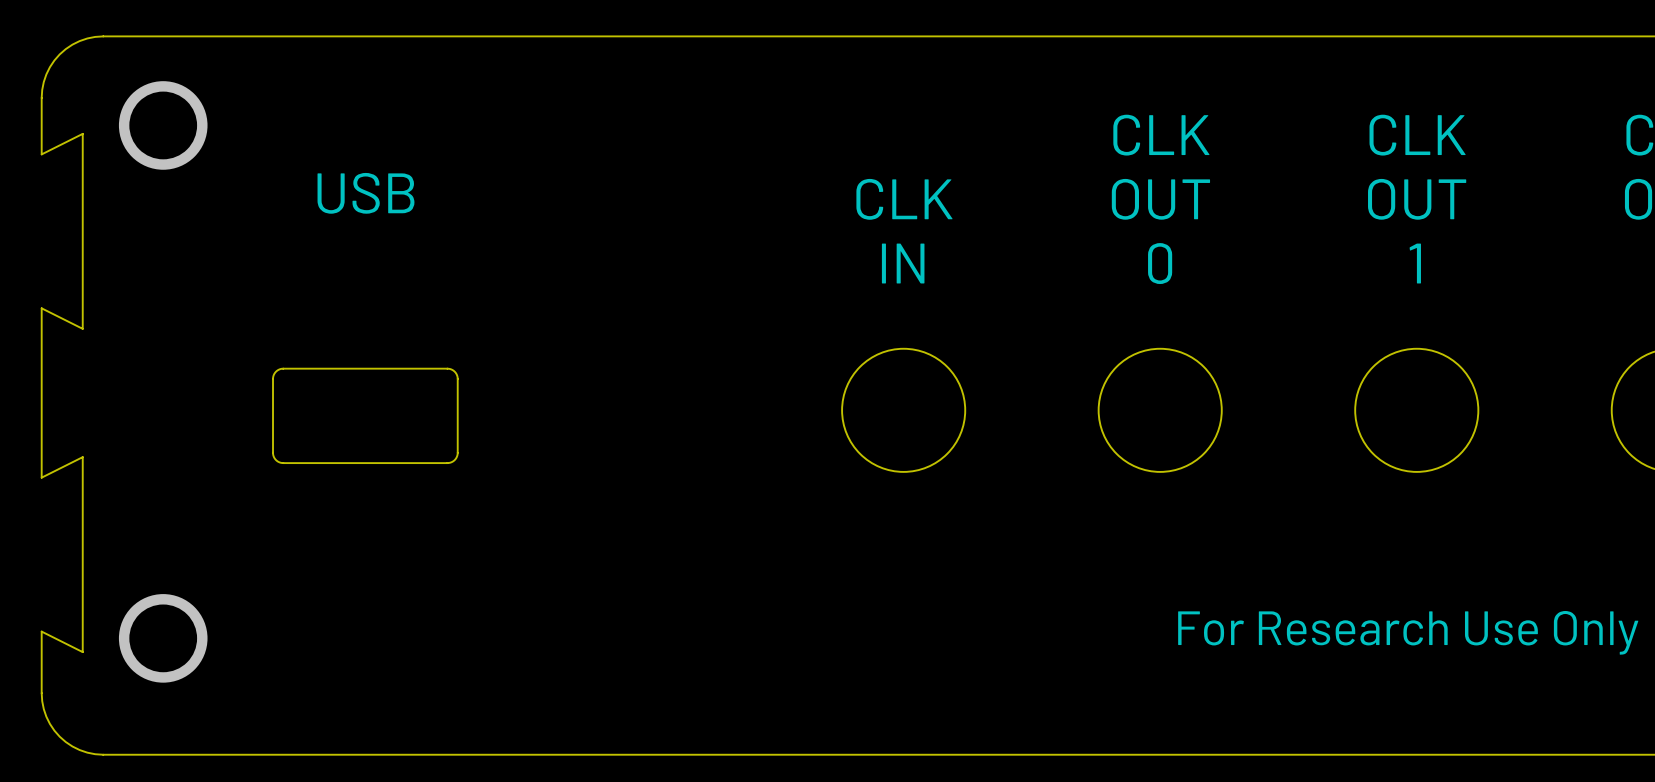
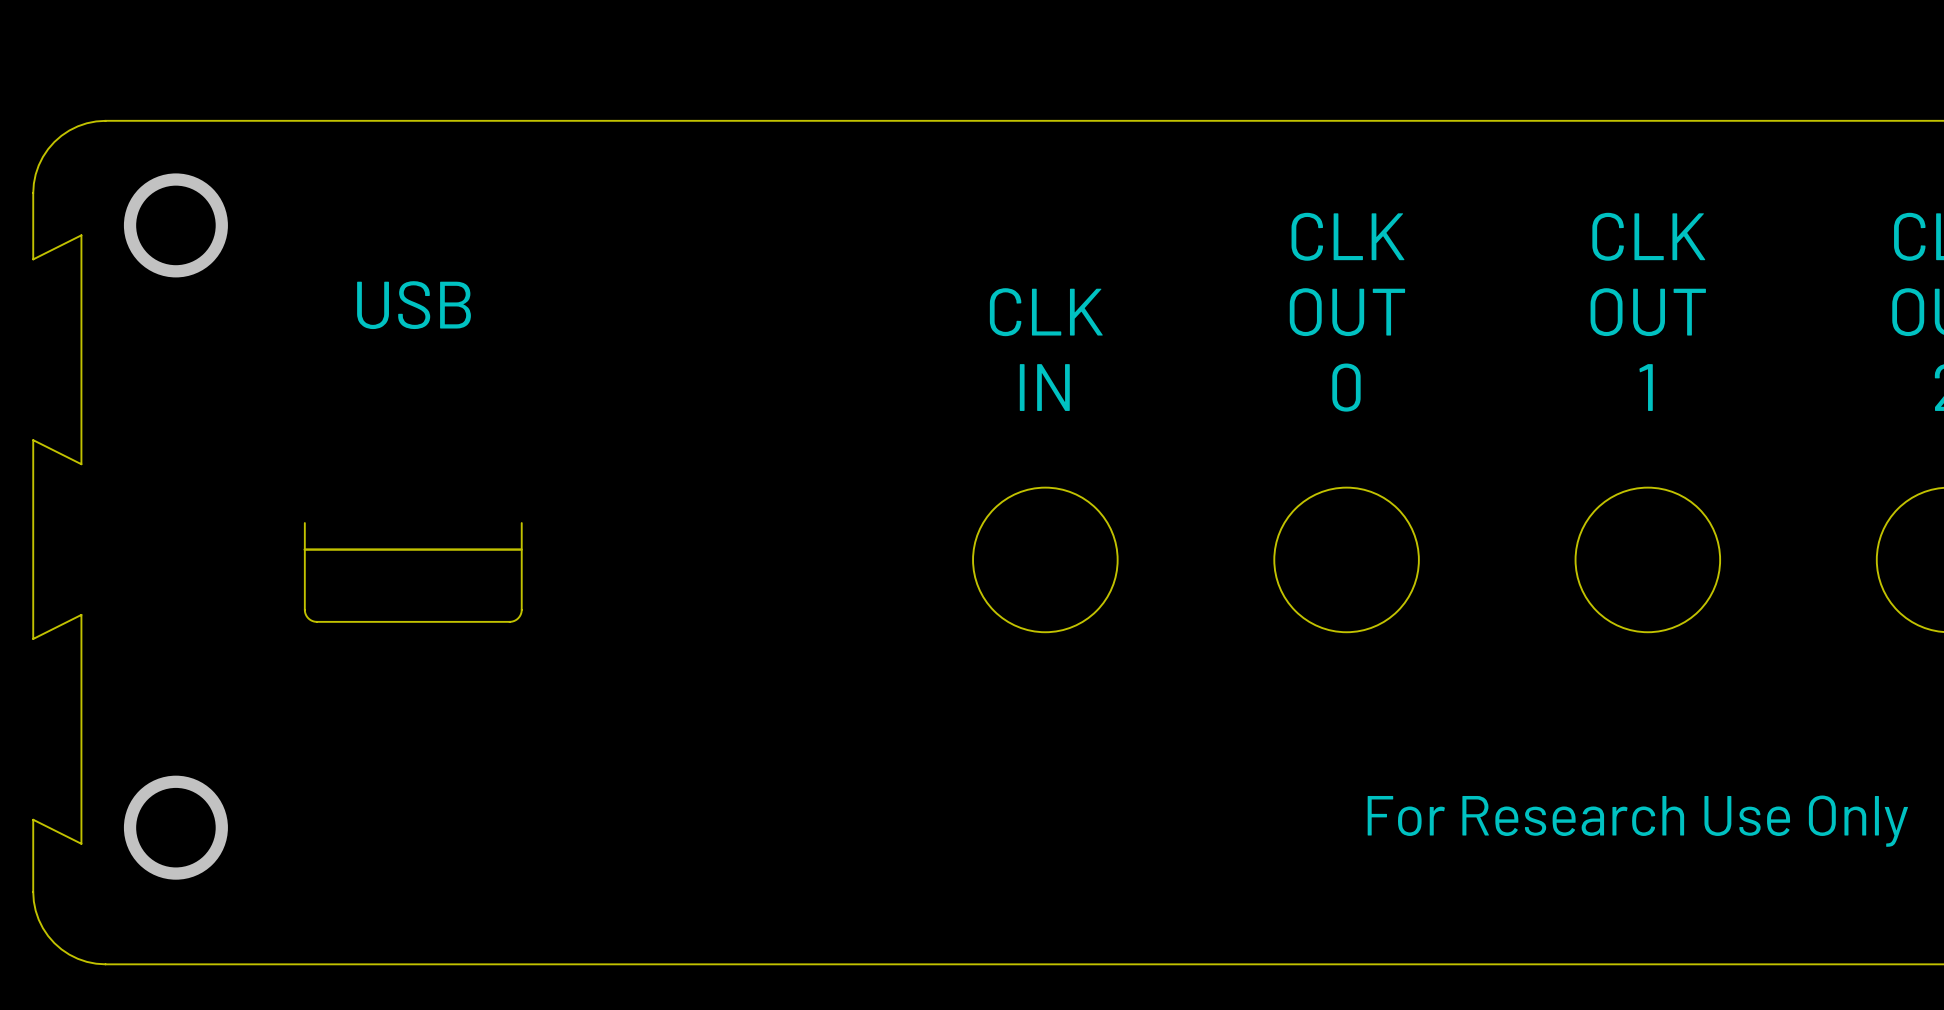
board edge: (273, 378) (276, 371) (283, 368) (447, 368) (454, 371) (457, 378) -> none
board edge: none -> (304, 549) (521, 549)

